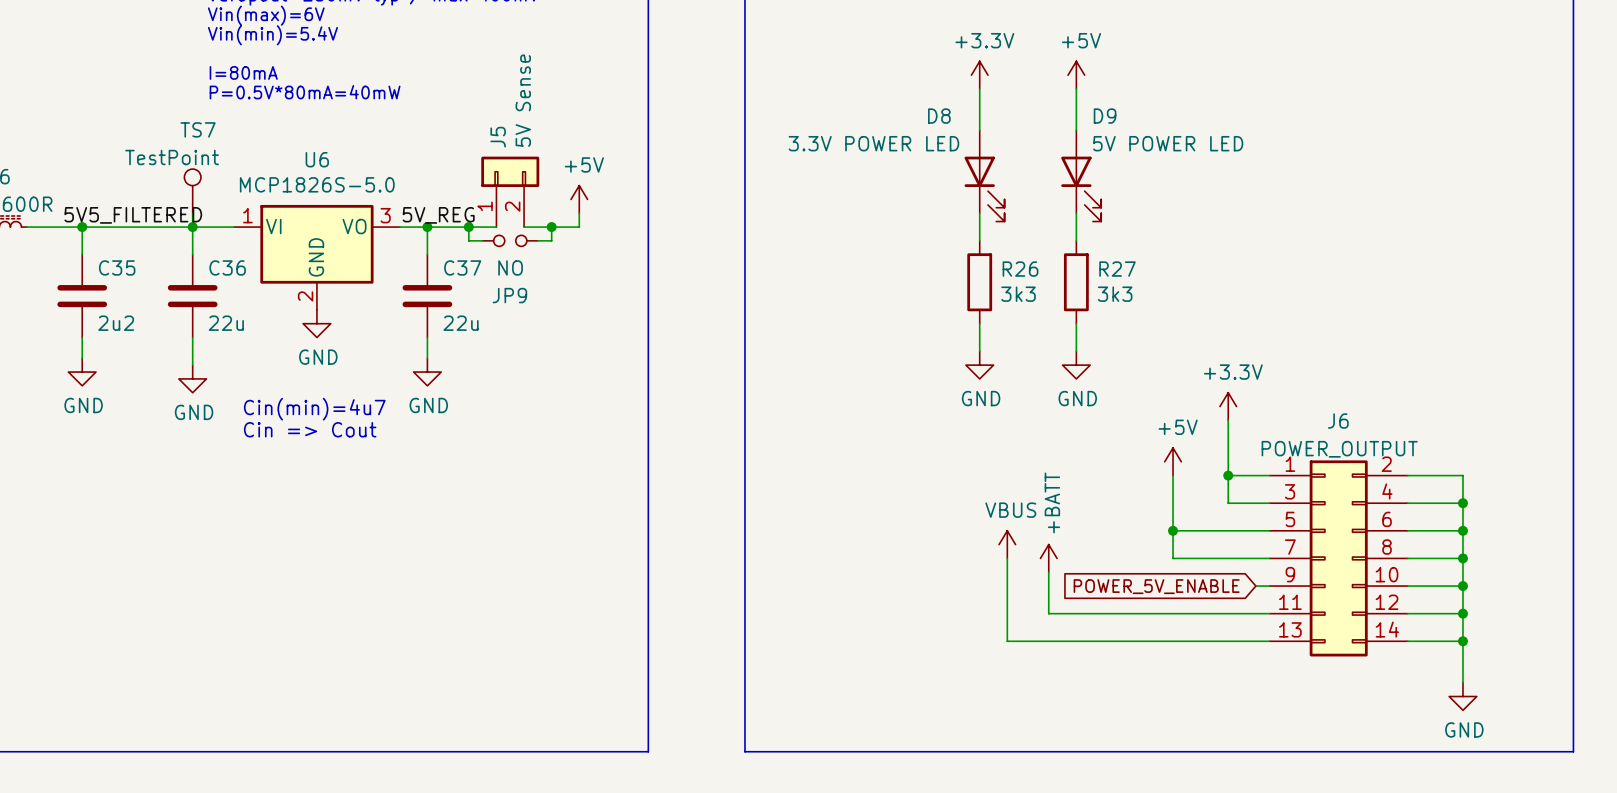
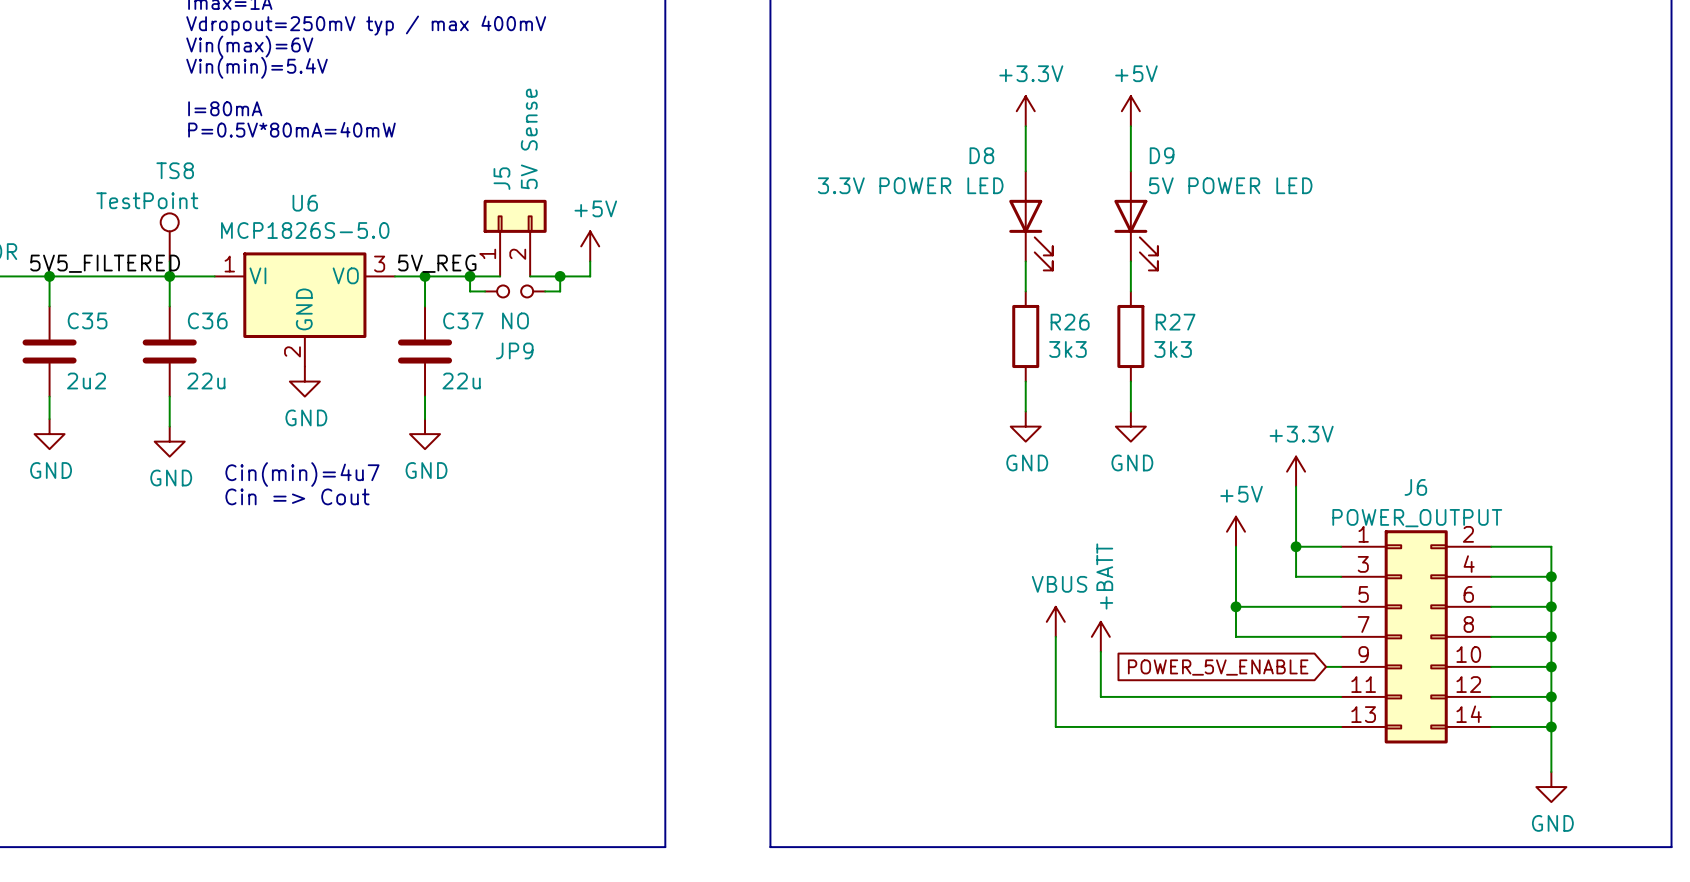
TS7 name: TS7 (198, 129) -> TS8 (175, 170)

